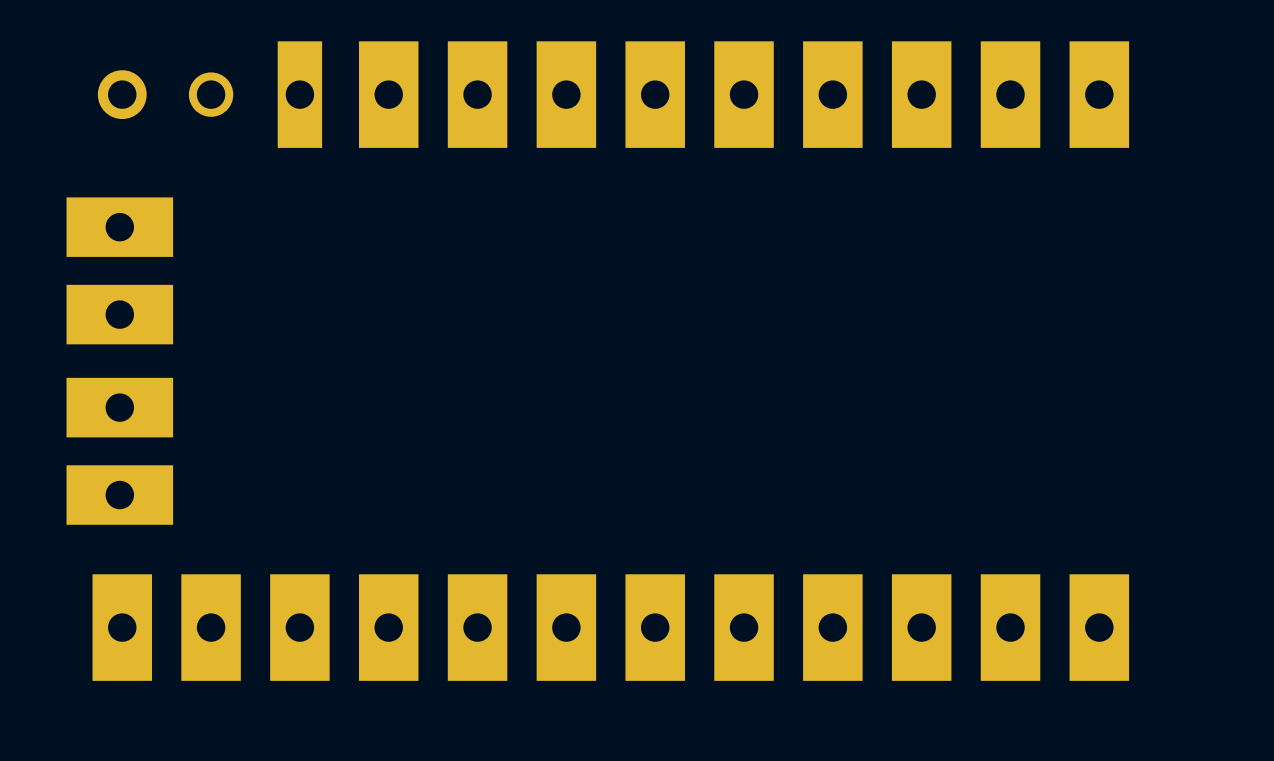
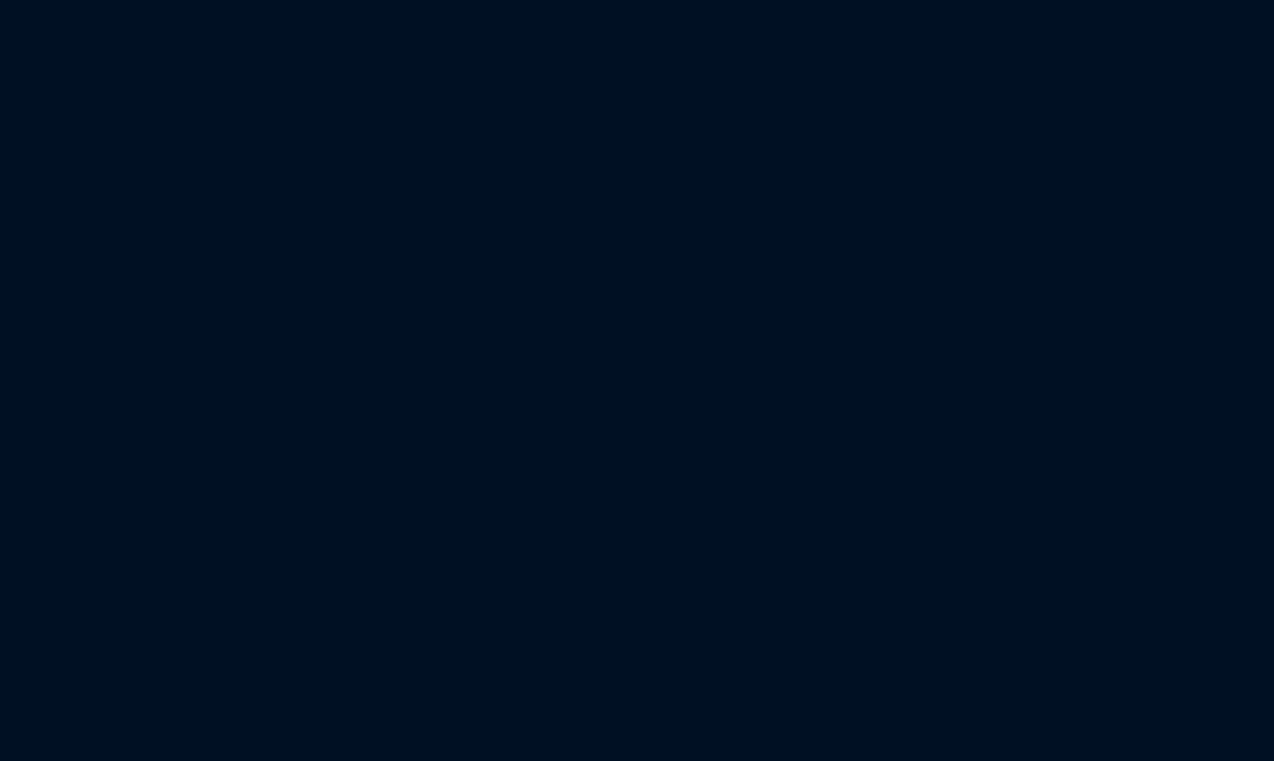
part: (597, 361) -> none

